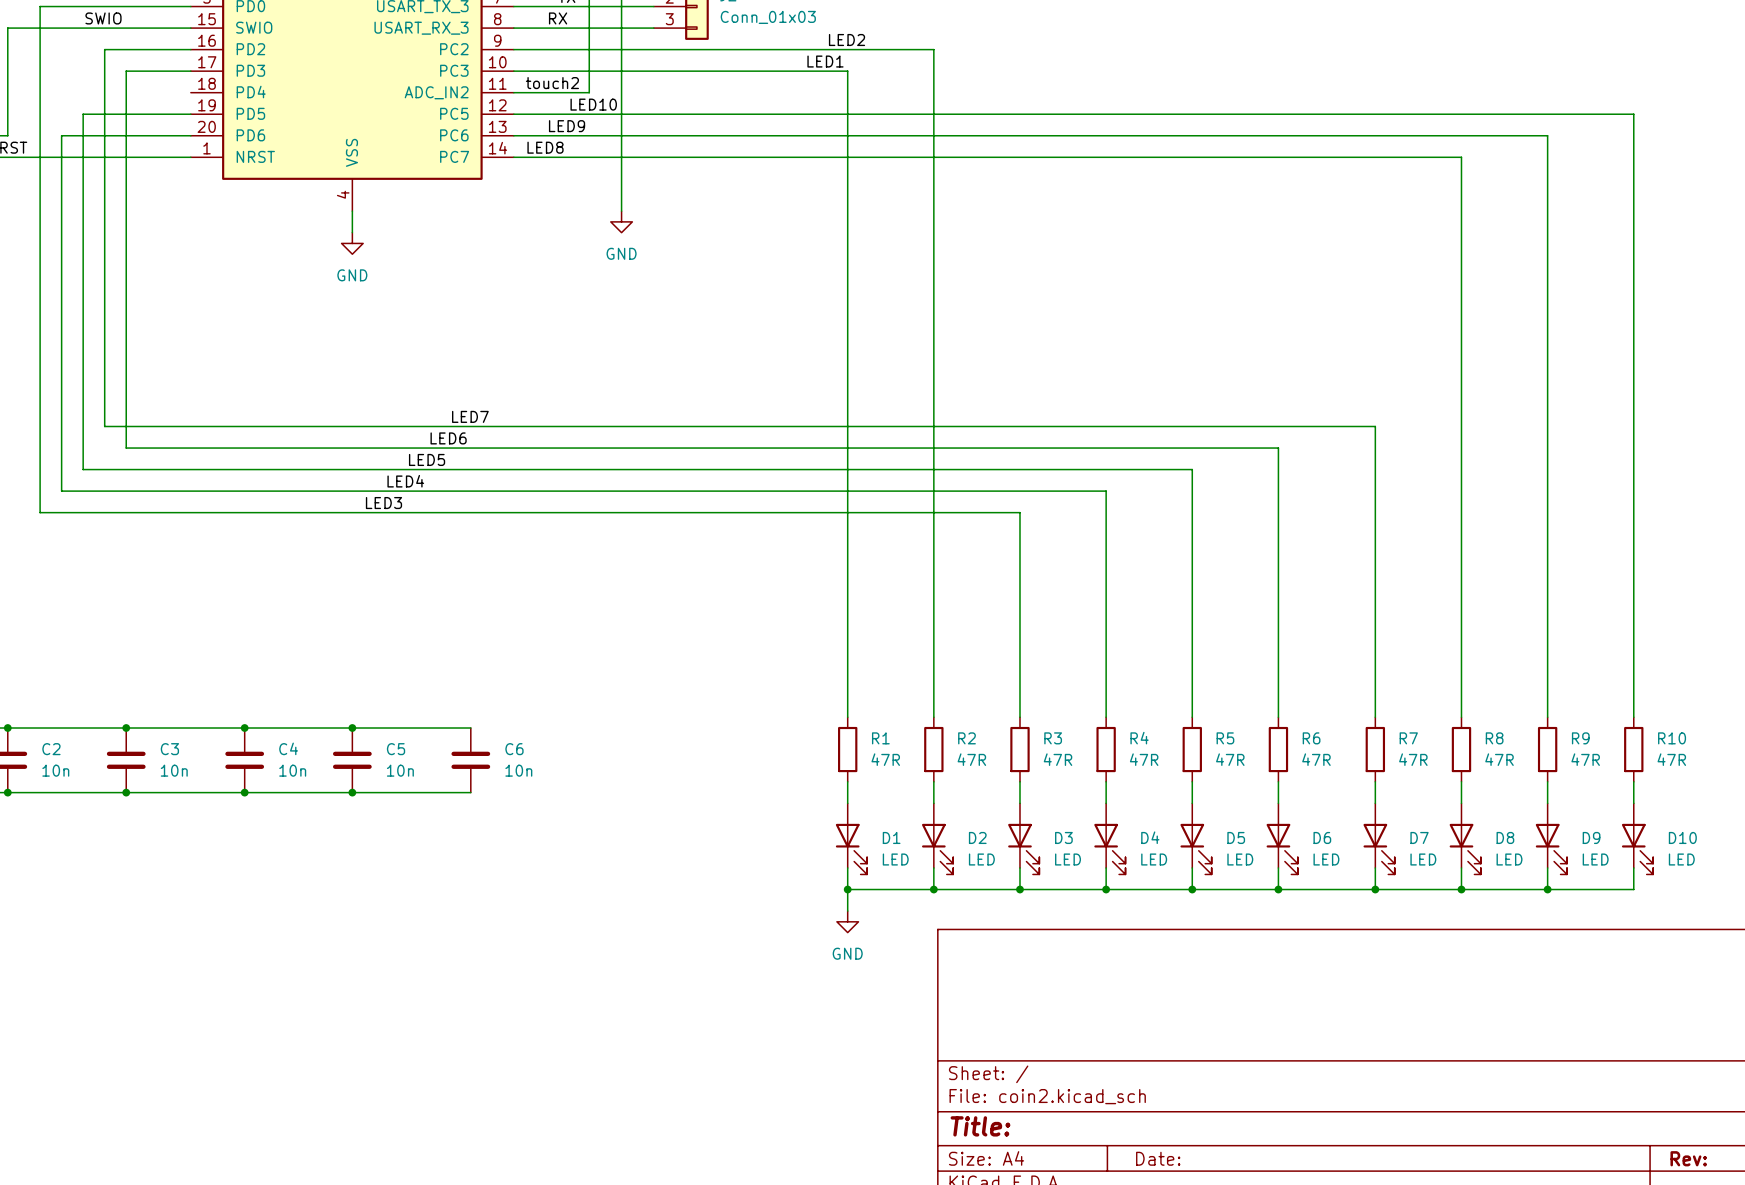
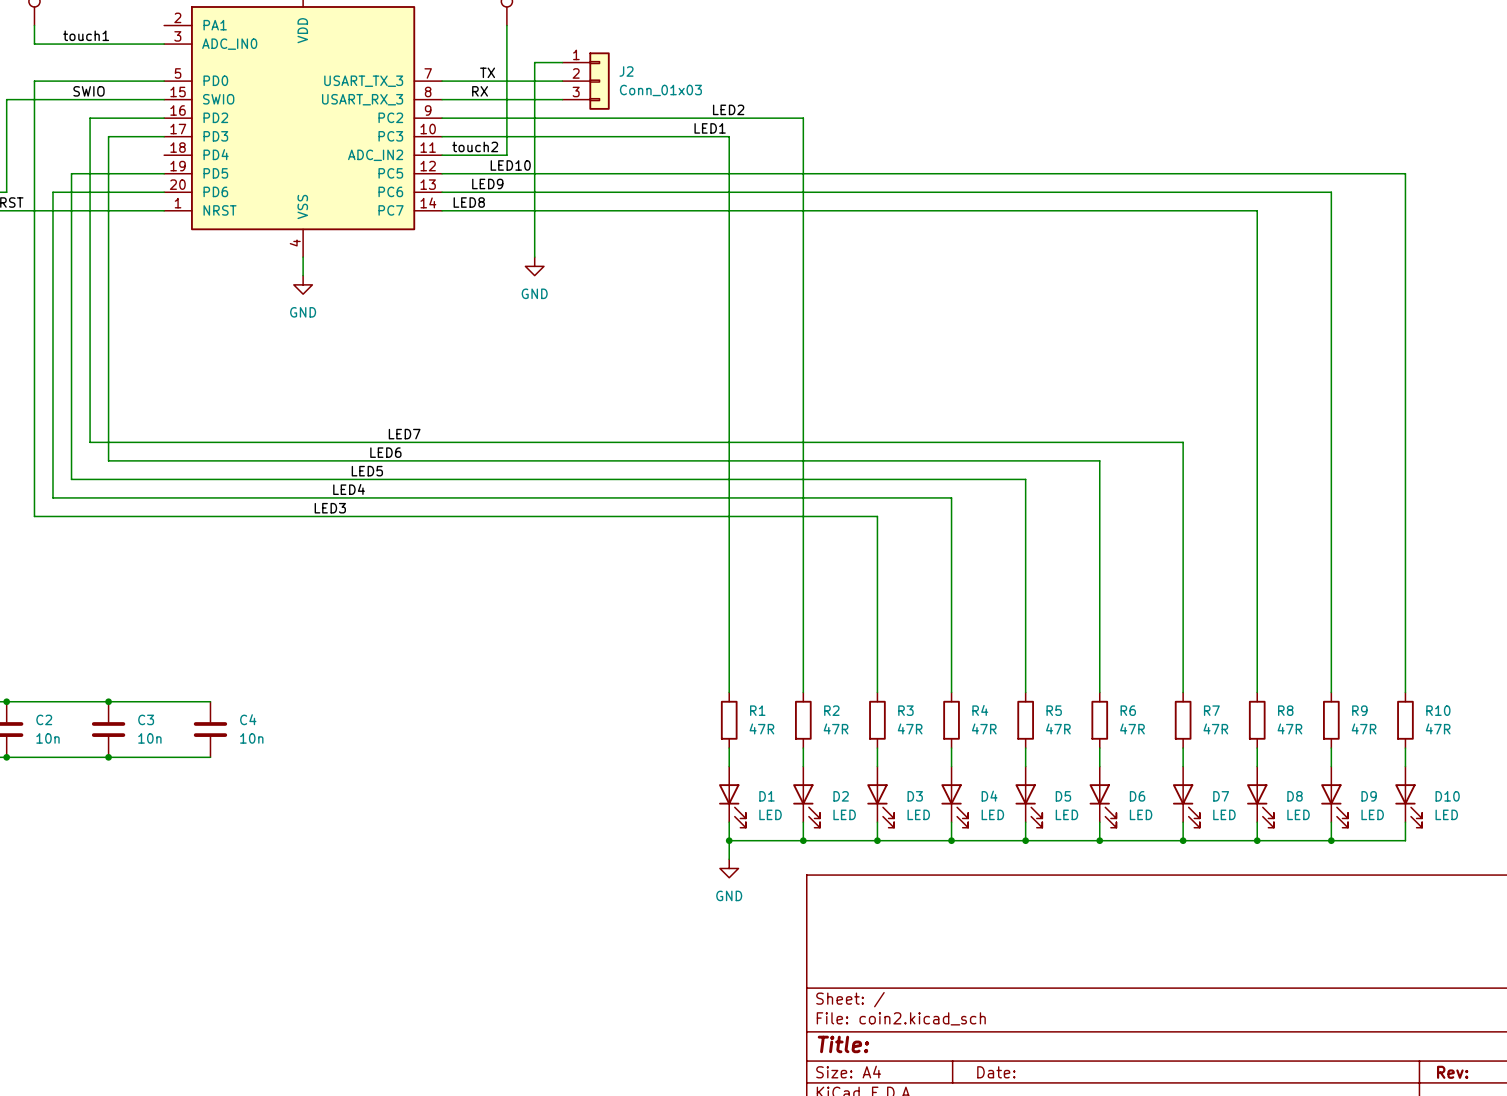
wire: (244, 728) (470, 728) -> none
junction: (244, 728) -> none
junction: (352, 728) -> none
C5: 10n (352, 760) -> none
C6: 10n (470, 760) -> none
wire: (244, 792) (470, 792) -> none
junction: (244, 792) -> none
junction: (352, 792) -> none

